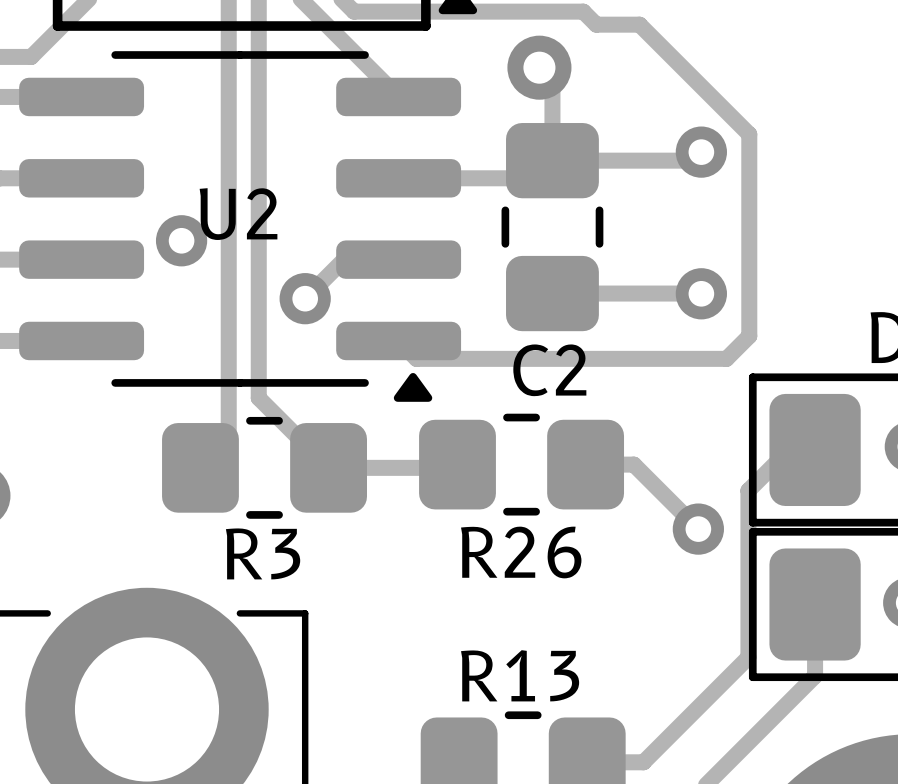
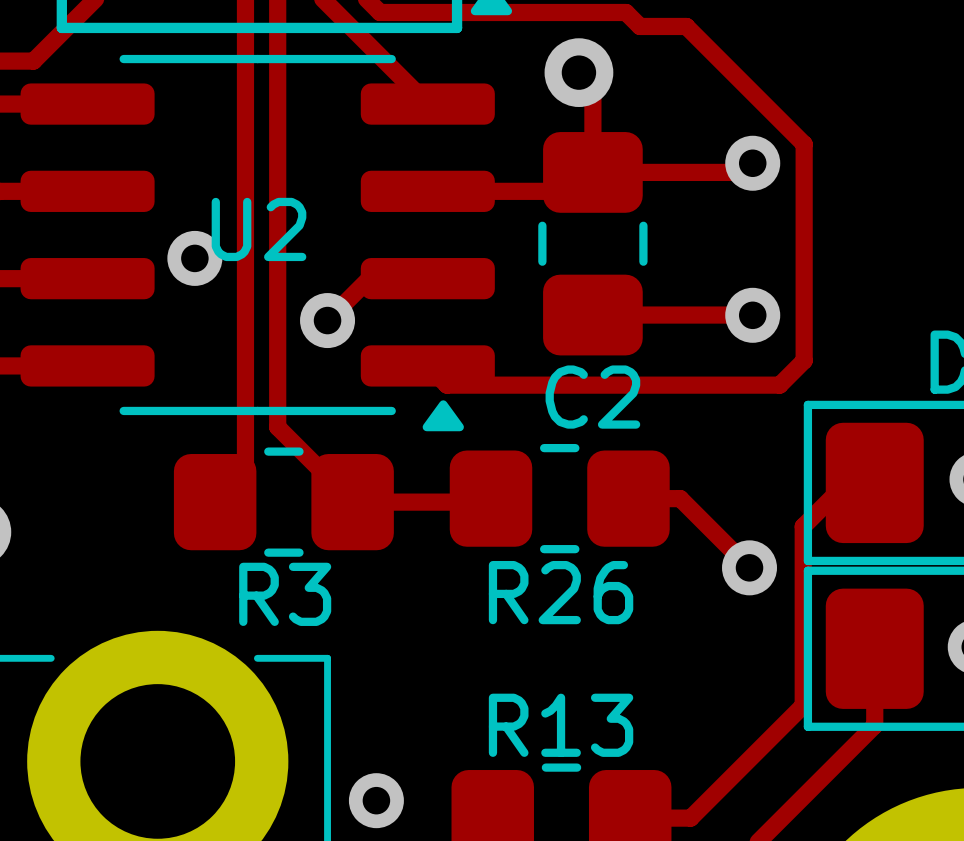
via: none -> (376, 800)

